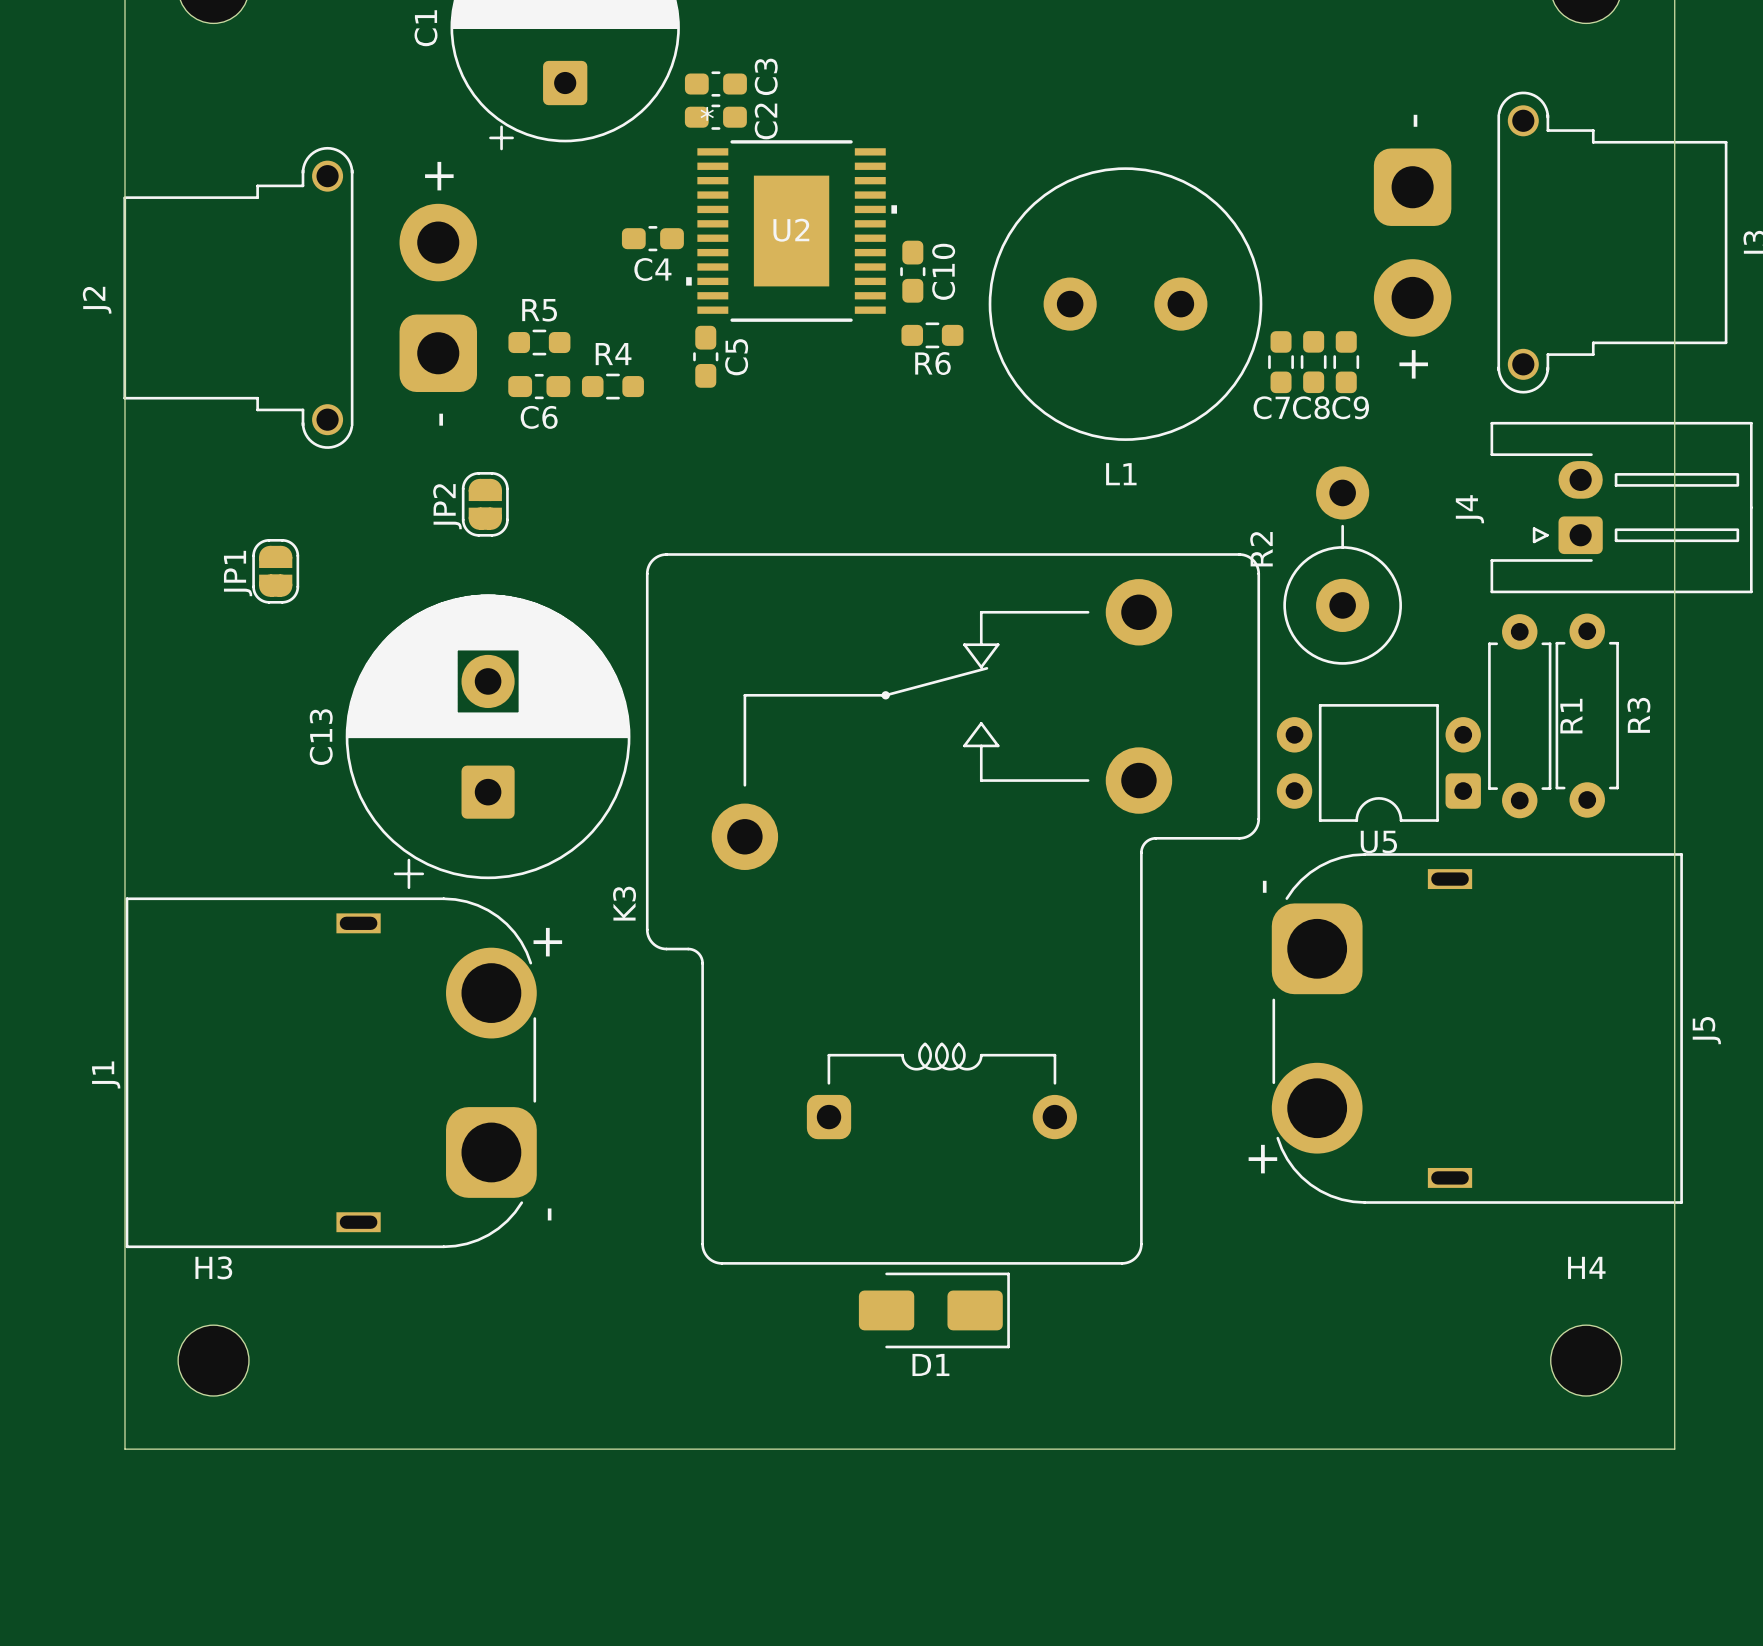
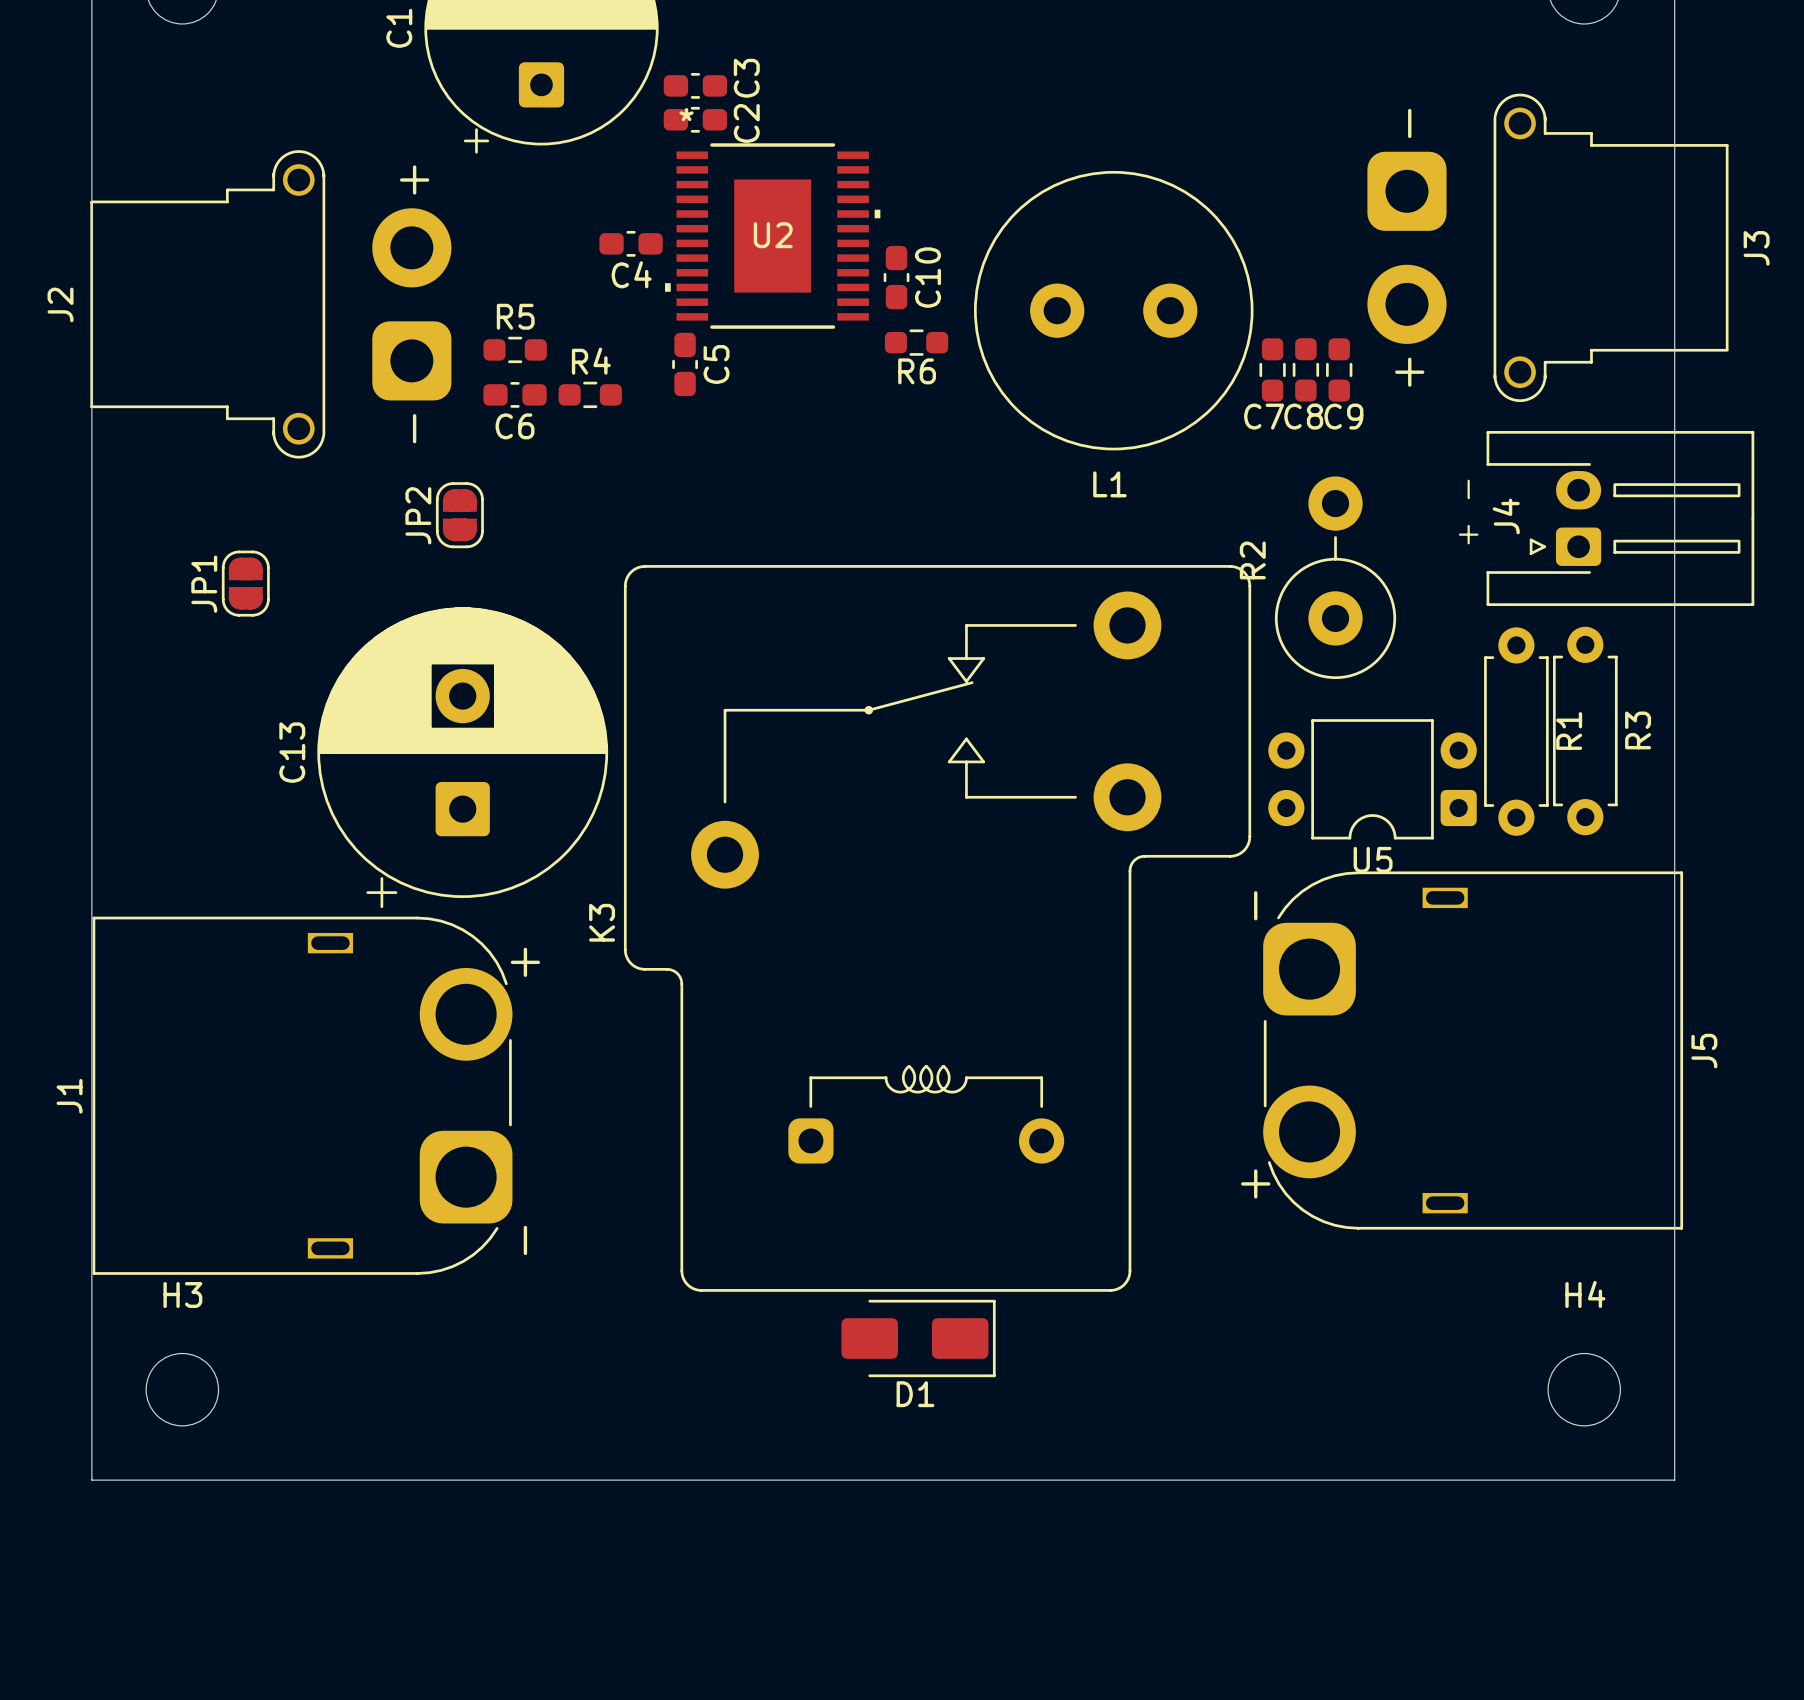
J4 name position: J4 (1469, 509) -> J4 (1506, 516)
text: none -> + - (1468, 512)

